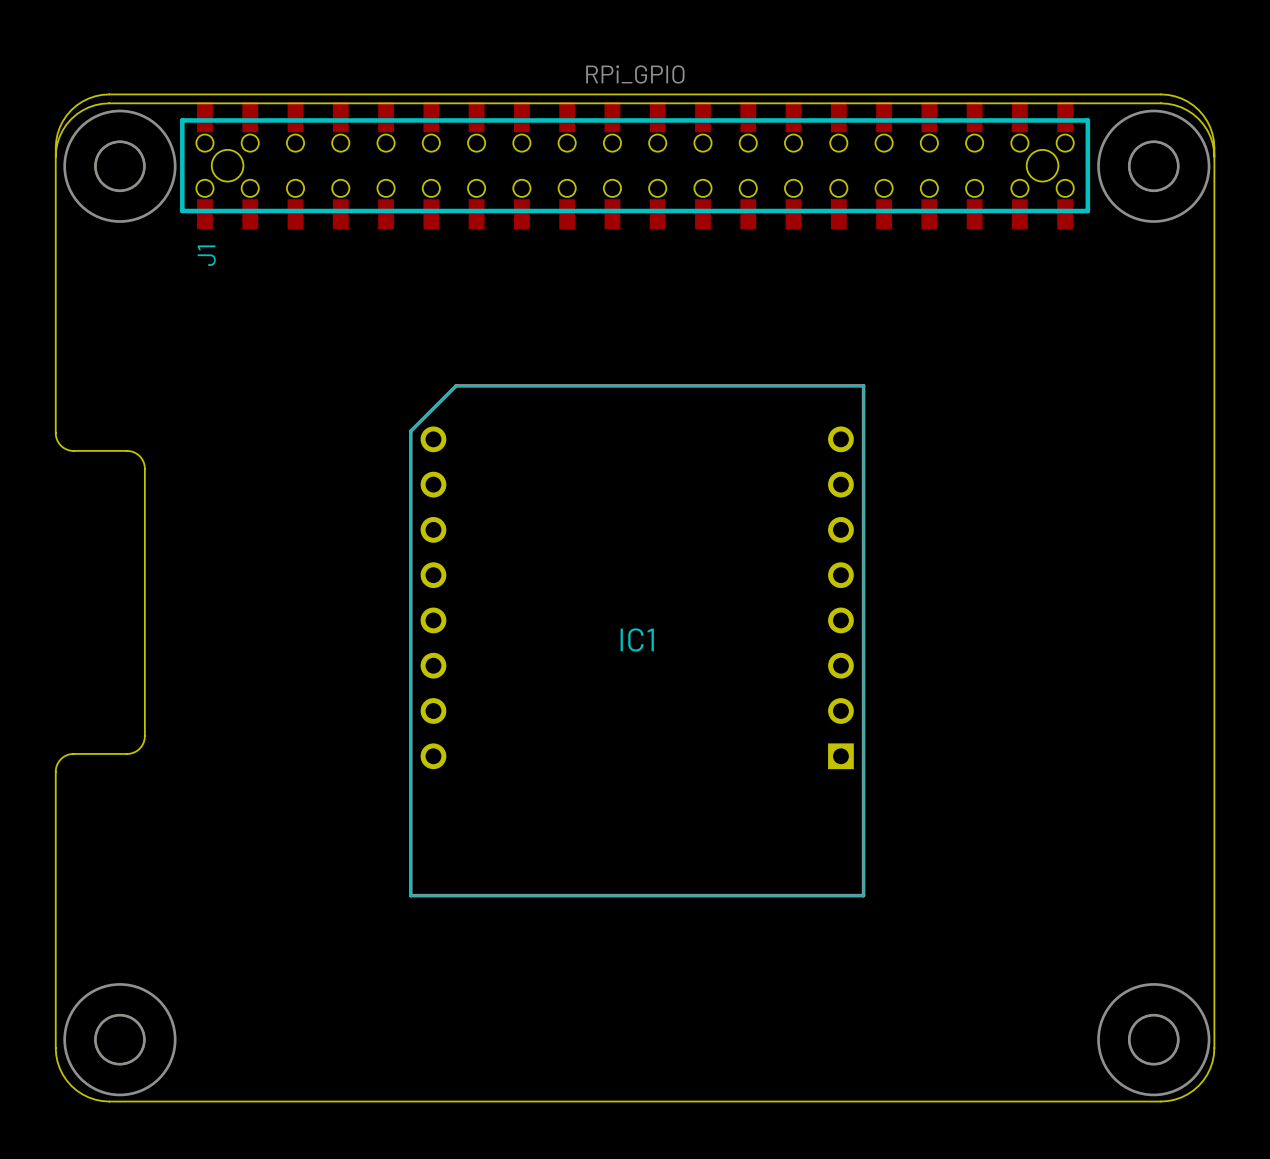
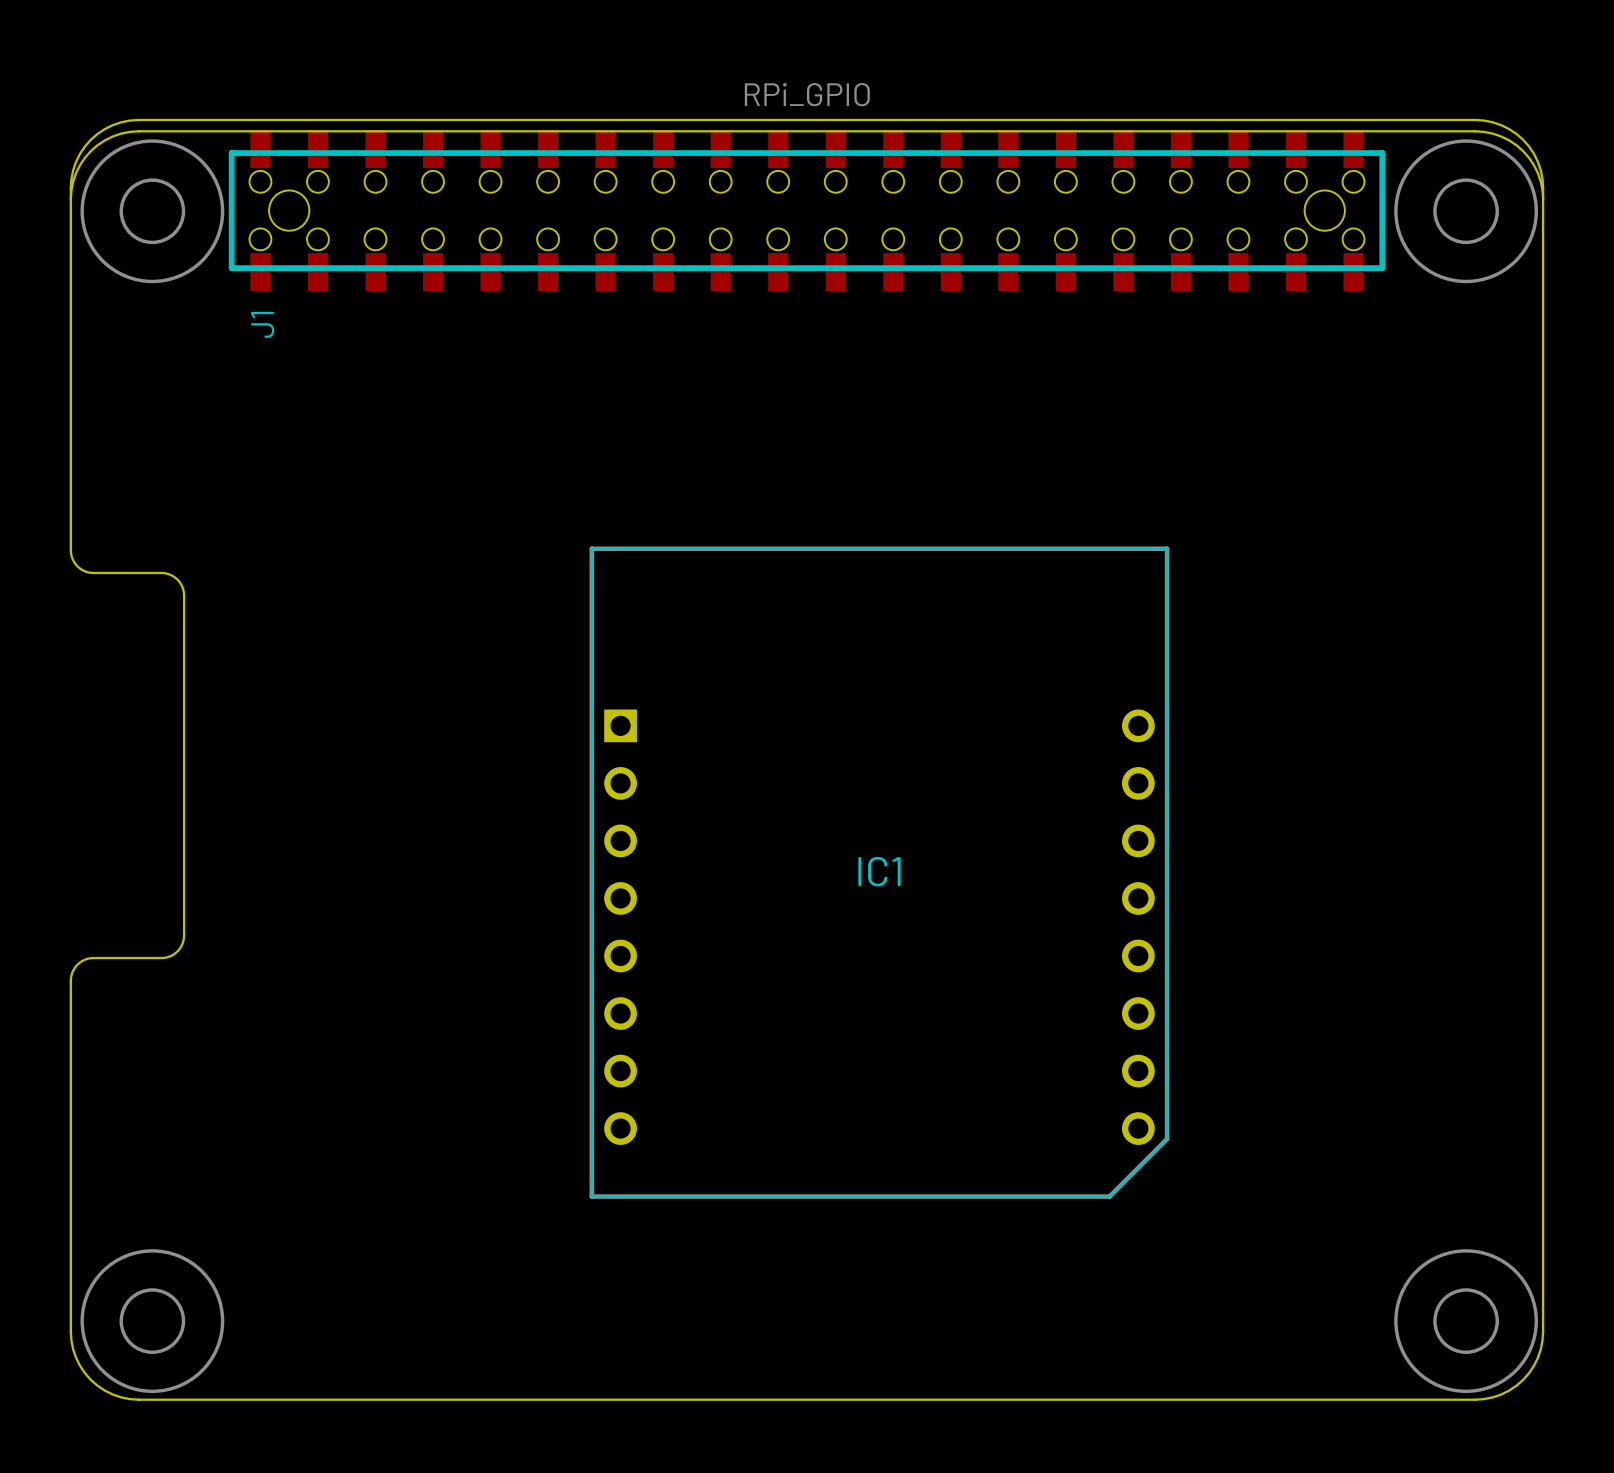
IC1 rotation: 0° (637, 640) -> 180° (879, 872)

